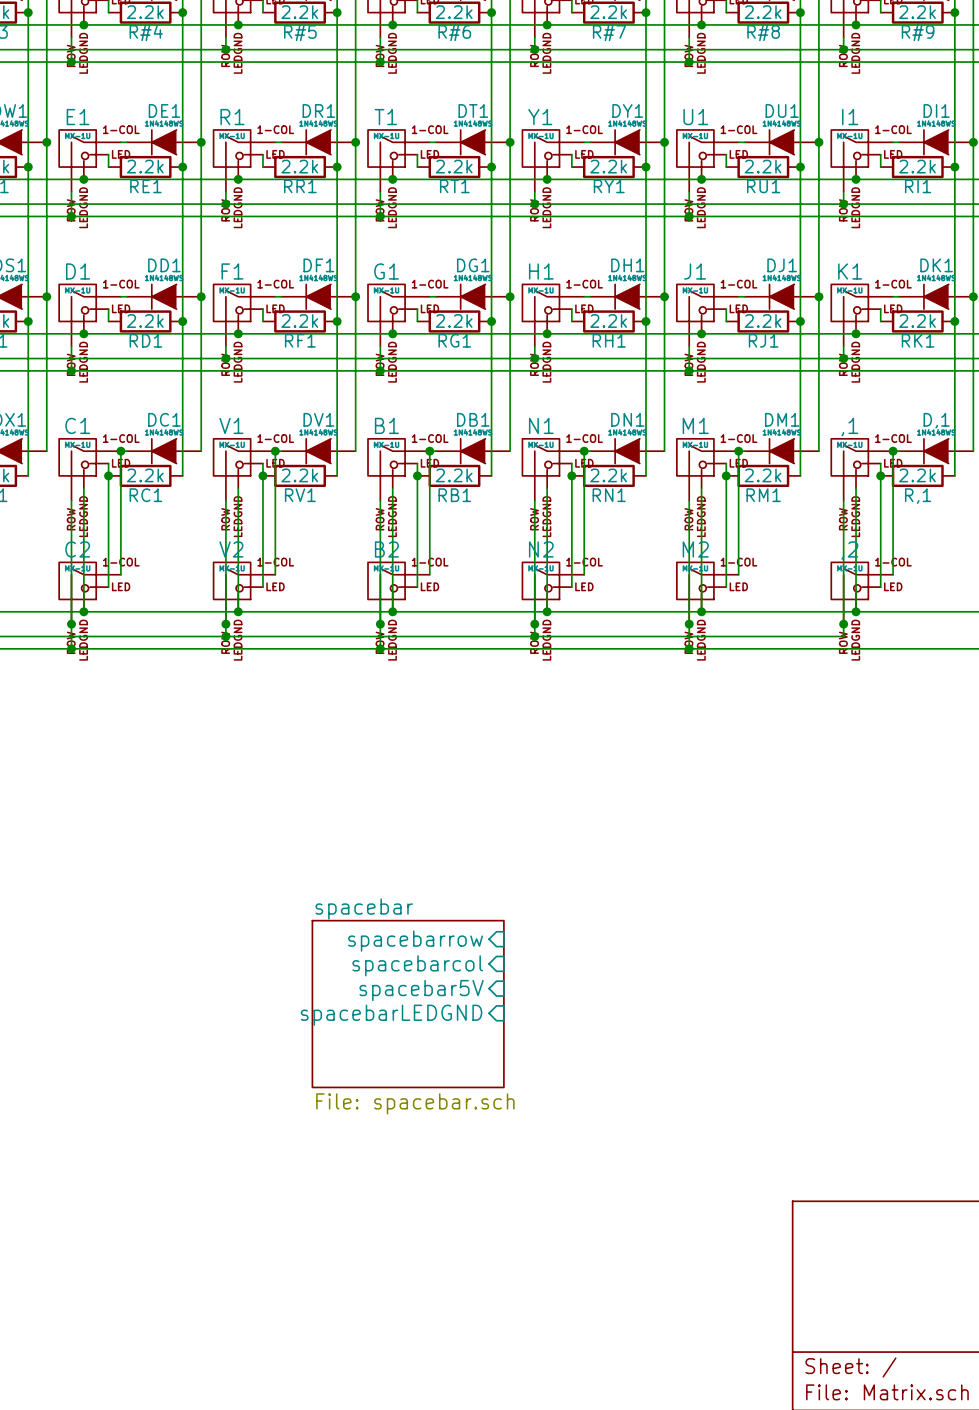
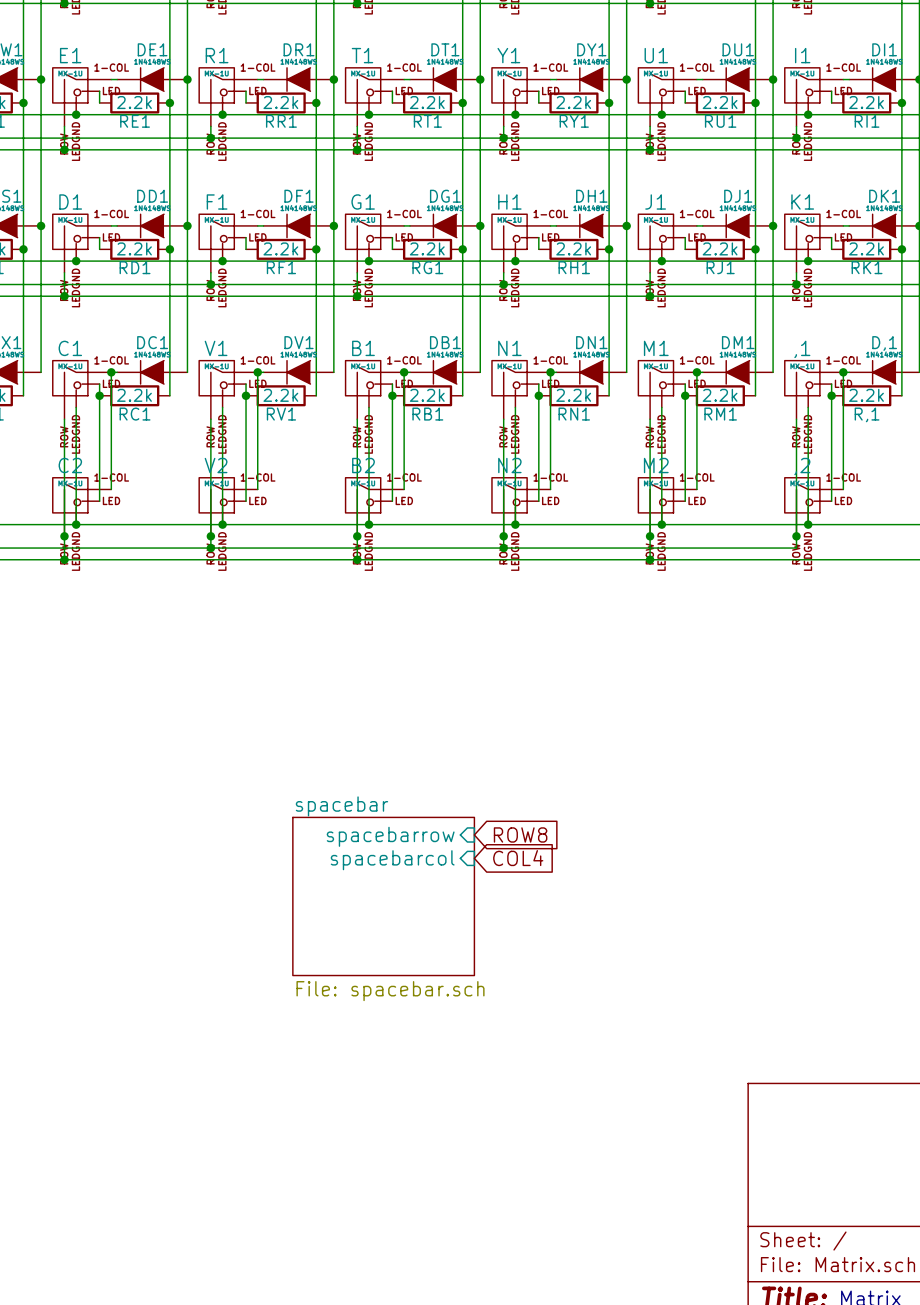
global label: none -> ROW8 (520, 834)
global label: none -> COL4 (518, 858)
sheet pin: spacebar5V (421, 990) -> none
sheet pin: spacebarLEDGND (391, 1015) -> none

